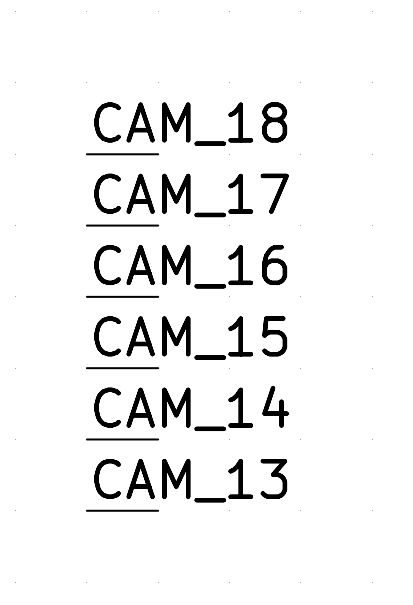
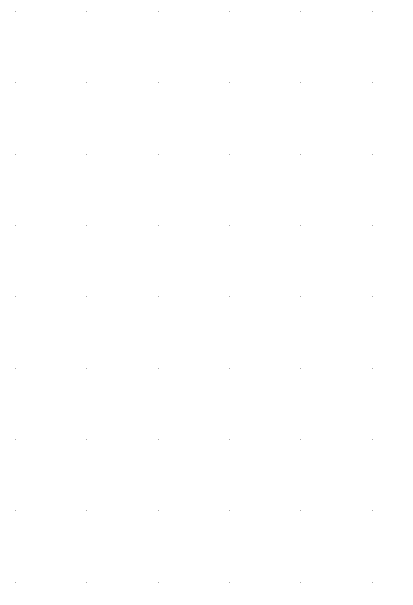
label: CAM_18 (190, 124) -> none
wire: (86, 154) (158, 154) -> none
label: CAM_17 (191, 195) -> none
wire: (86, 225) (158, 225) -> none
label: CAM_16 (190, 266) -> none
wire: (86, 296) (158, 296) -> none
label: CAM_15 (190, 338) -> none
wire: (86, 368) (158, 368) -> none
label: CAM_14 (191, 408) -> none
wire: (86, 439) (158, 439) -> none
label: CAM_13 (190, 480) -> none
wire: (86, 510) (158, 510) -> none

